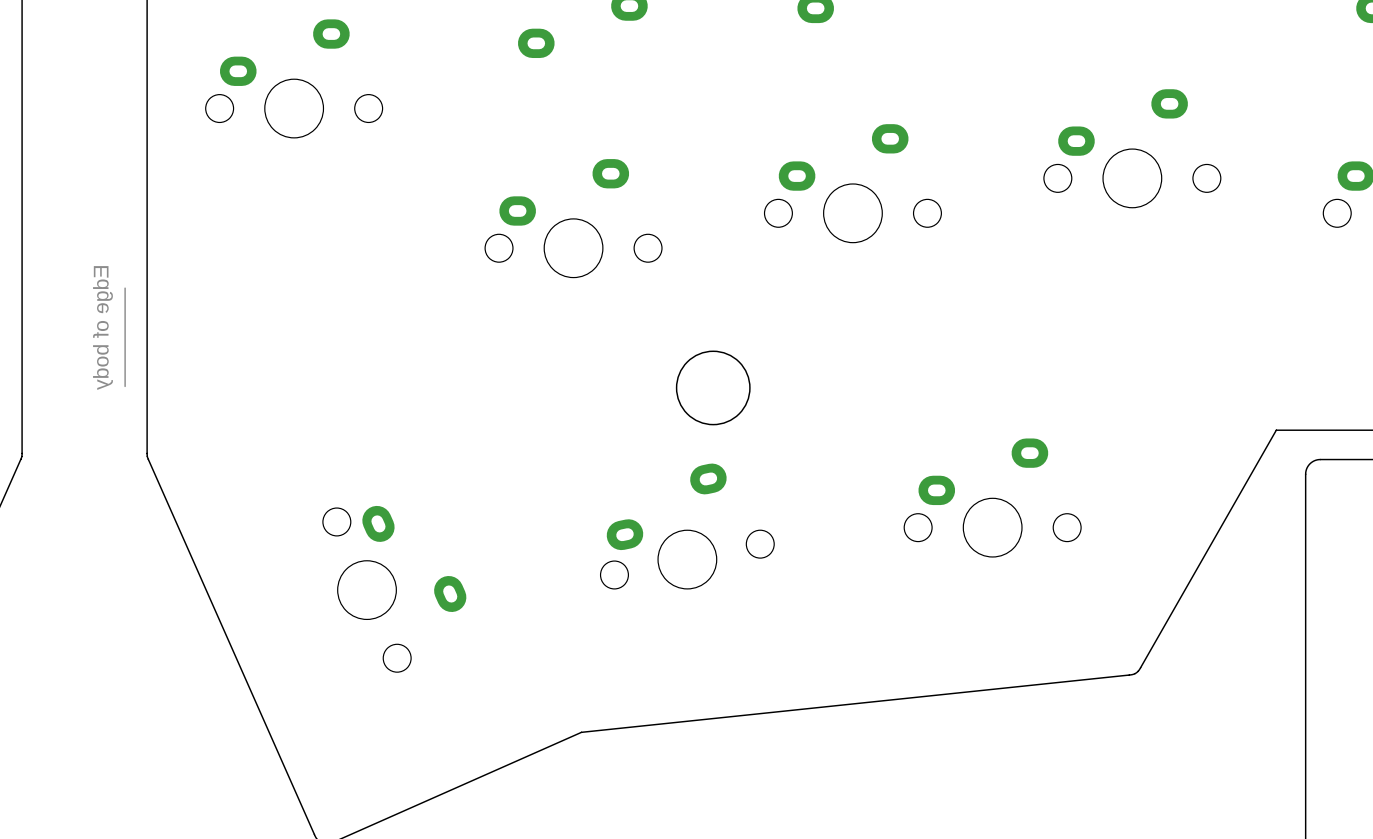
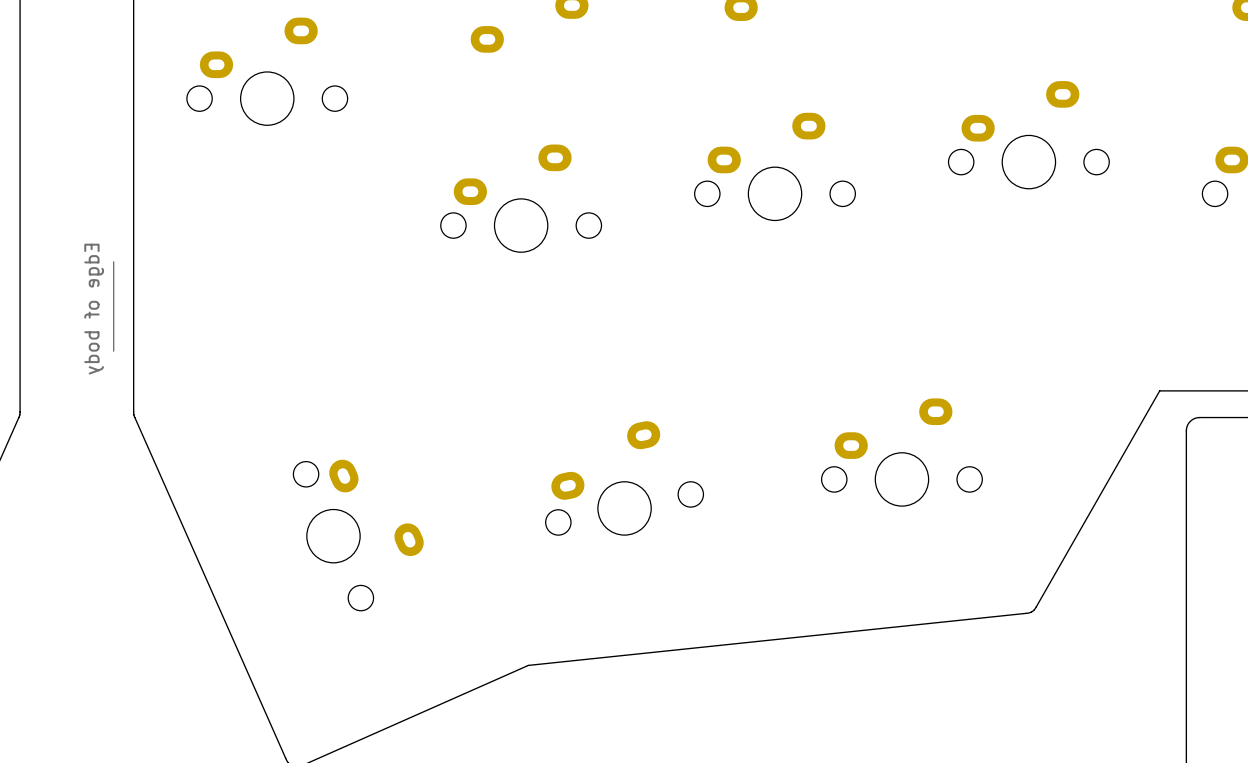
round board edge: [675, 350, 751, 426] -> none

